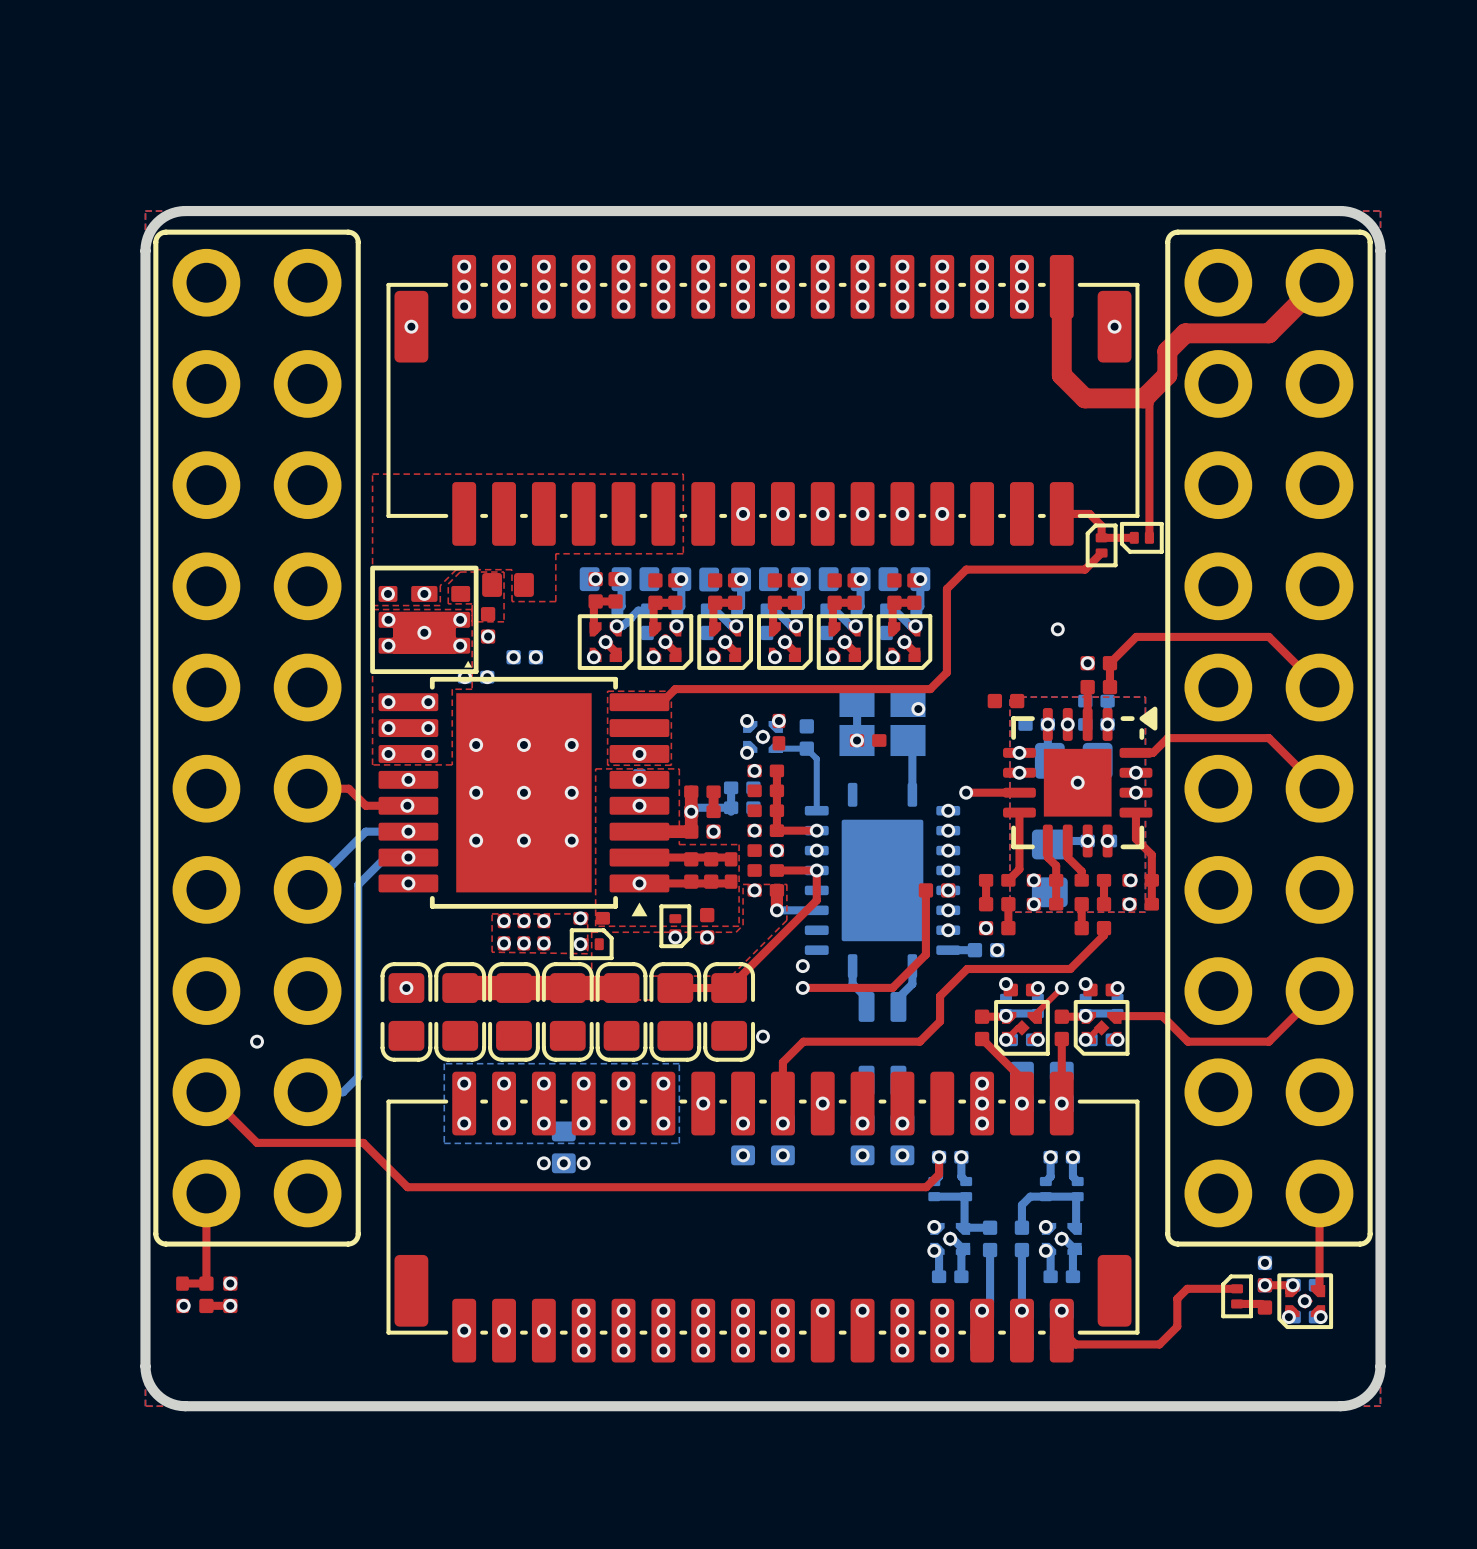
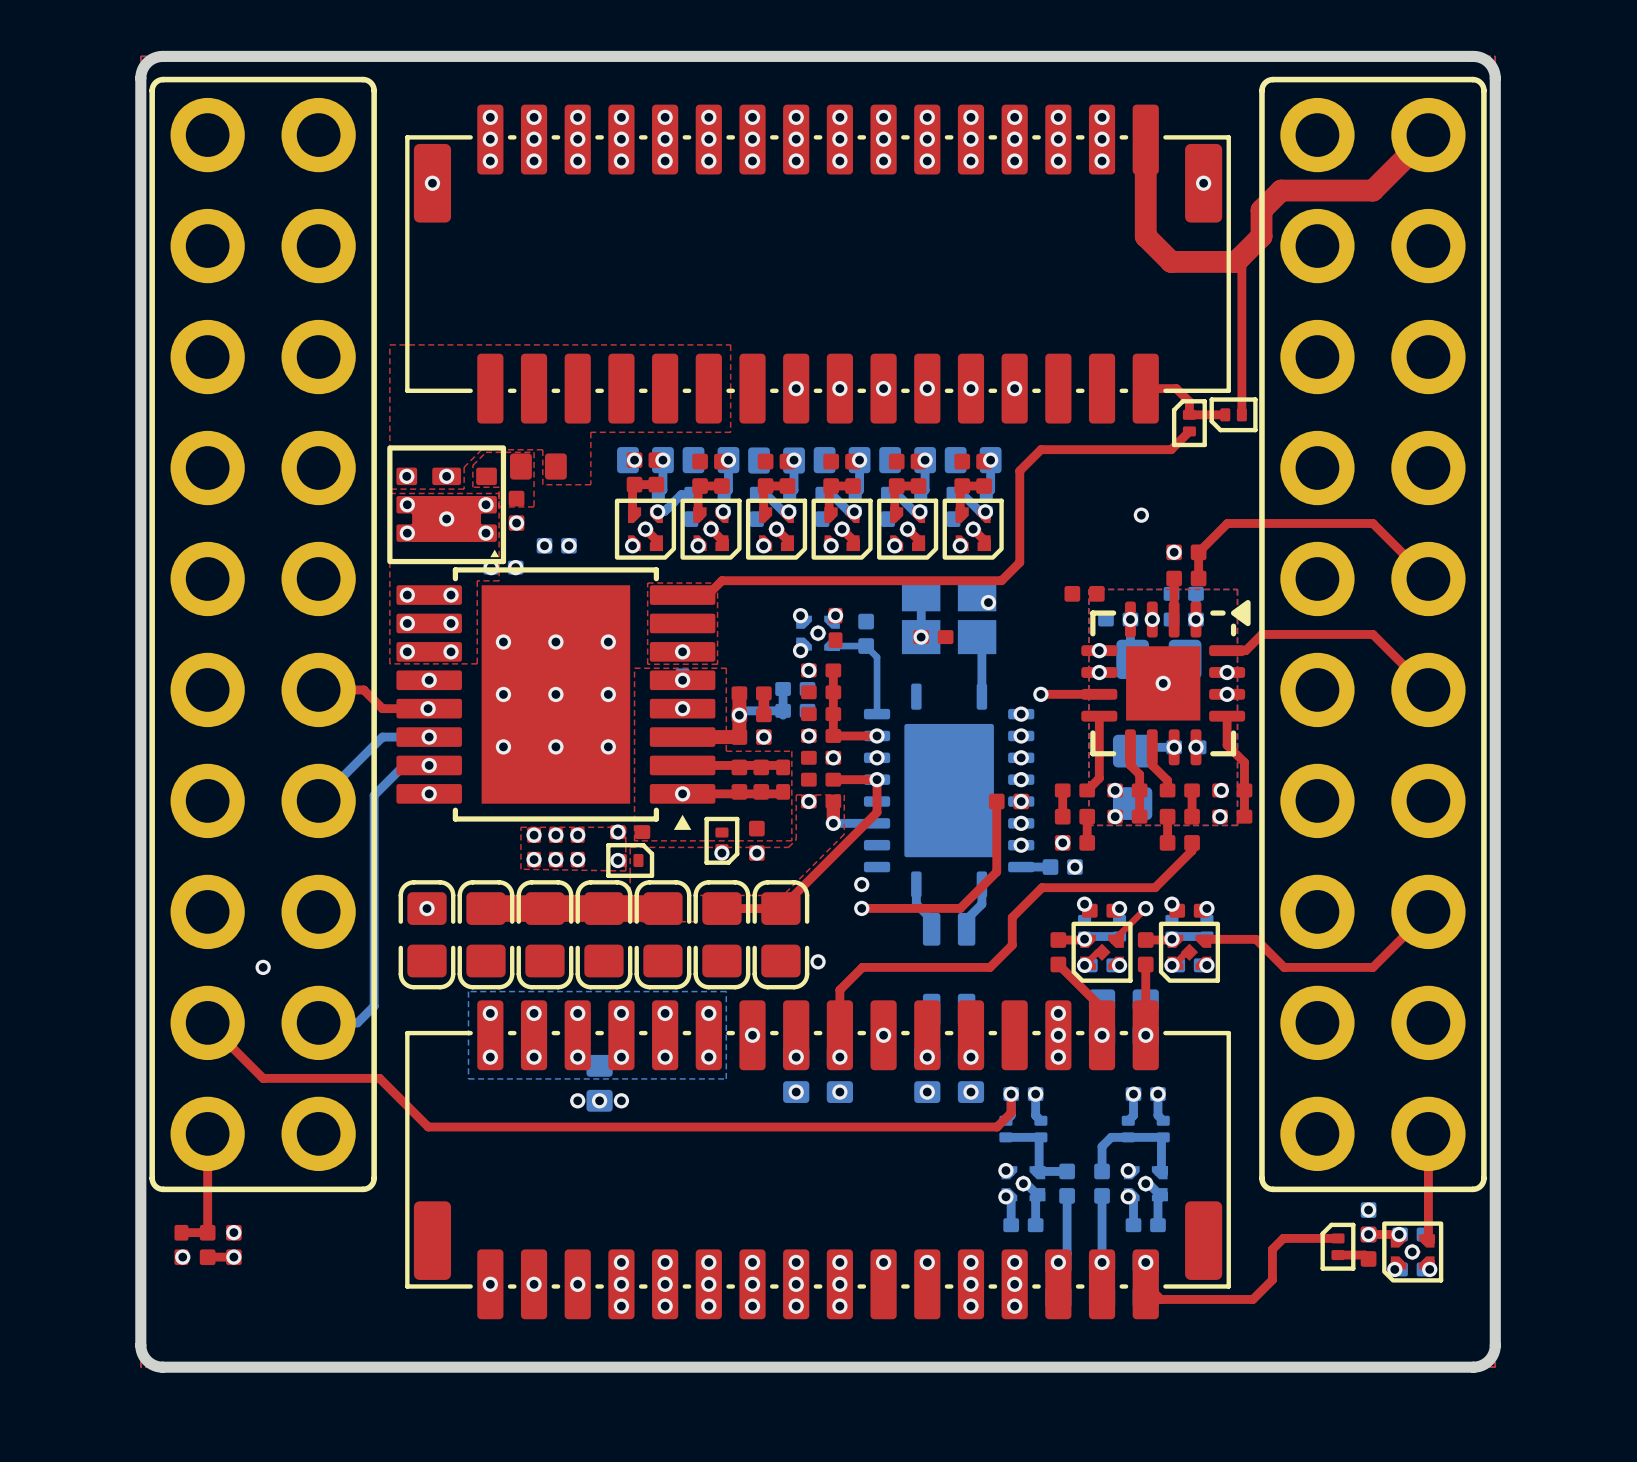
part footprint: [140, 205, 1386, 1412] -> [135, 50, 1501, 1373]

